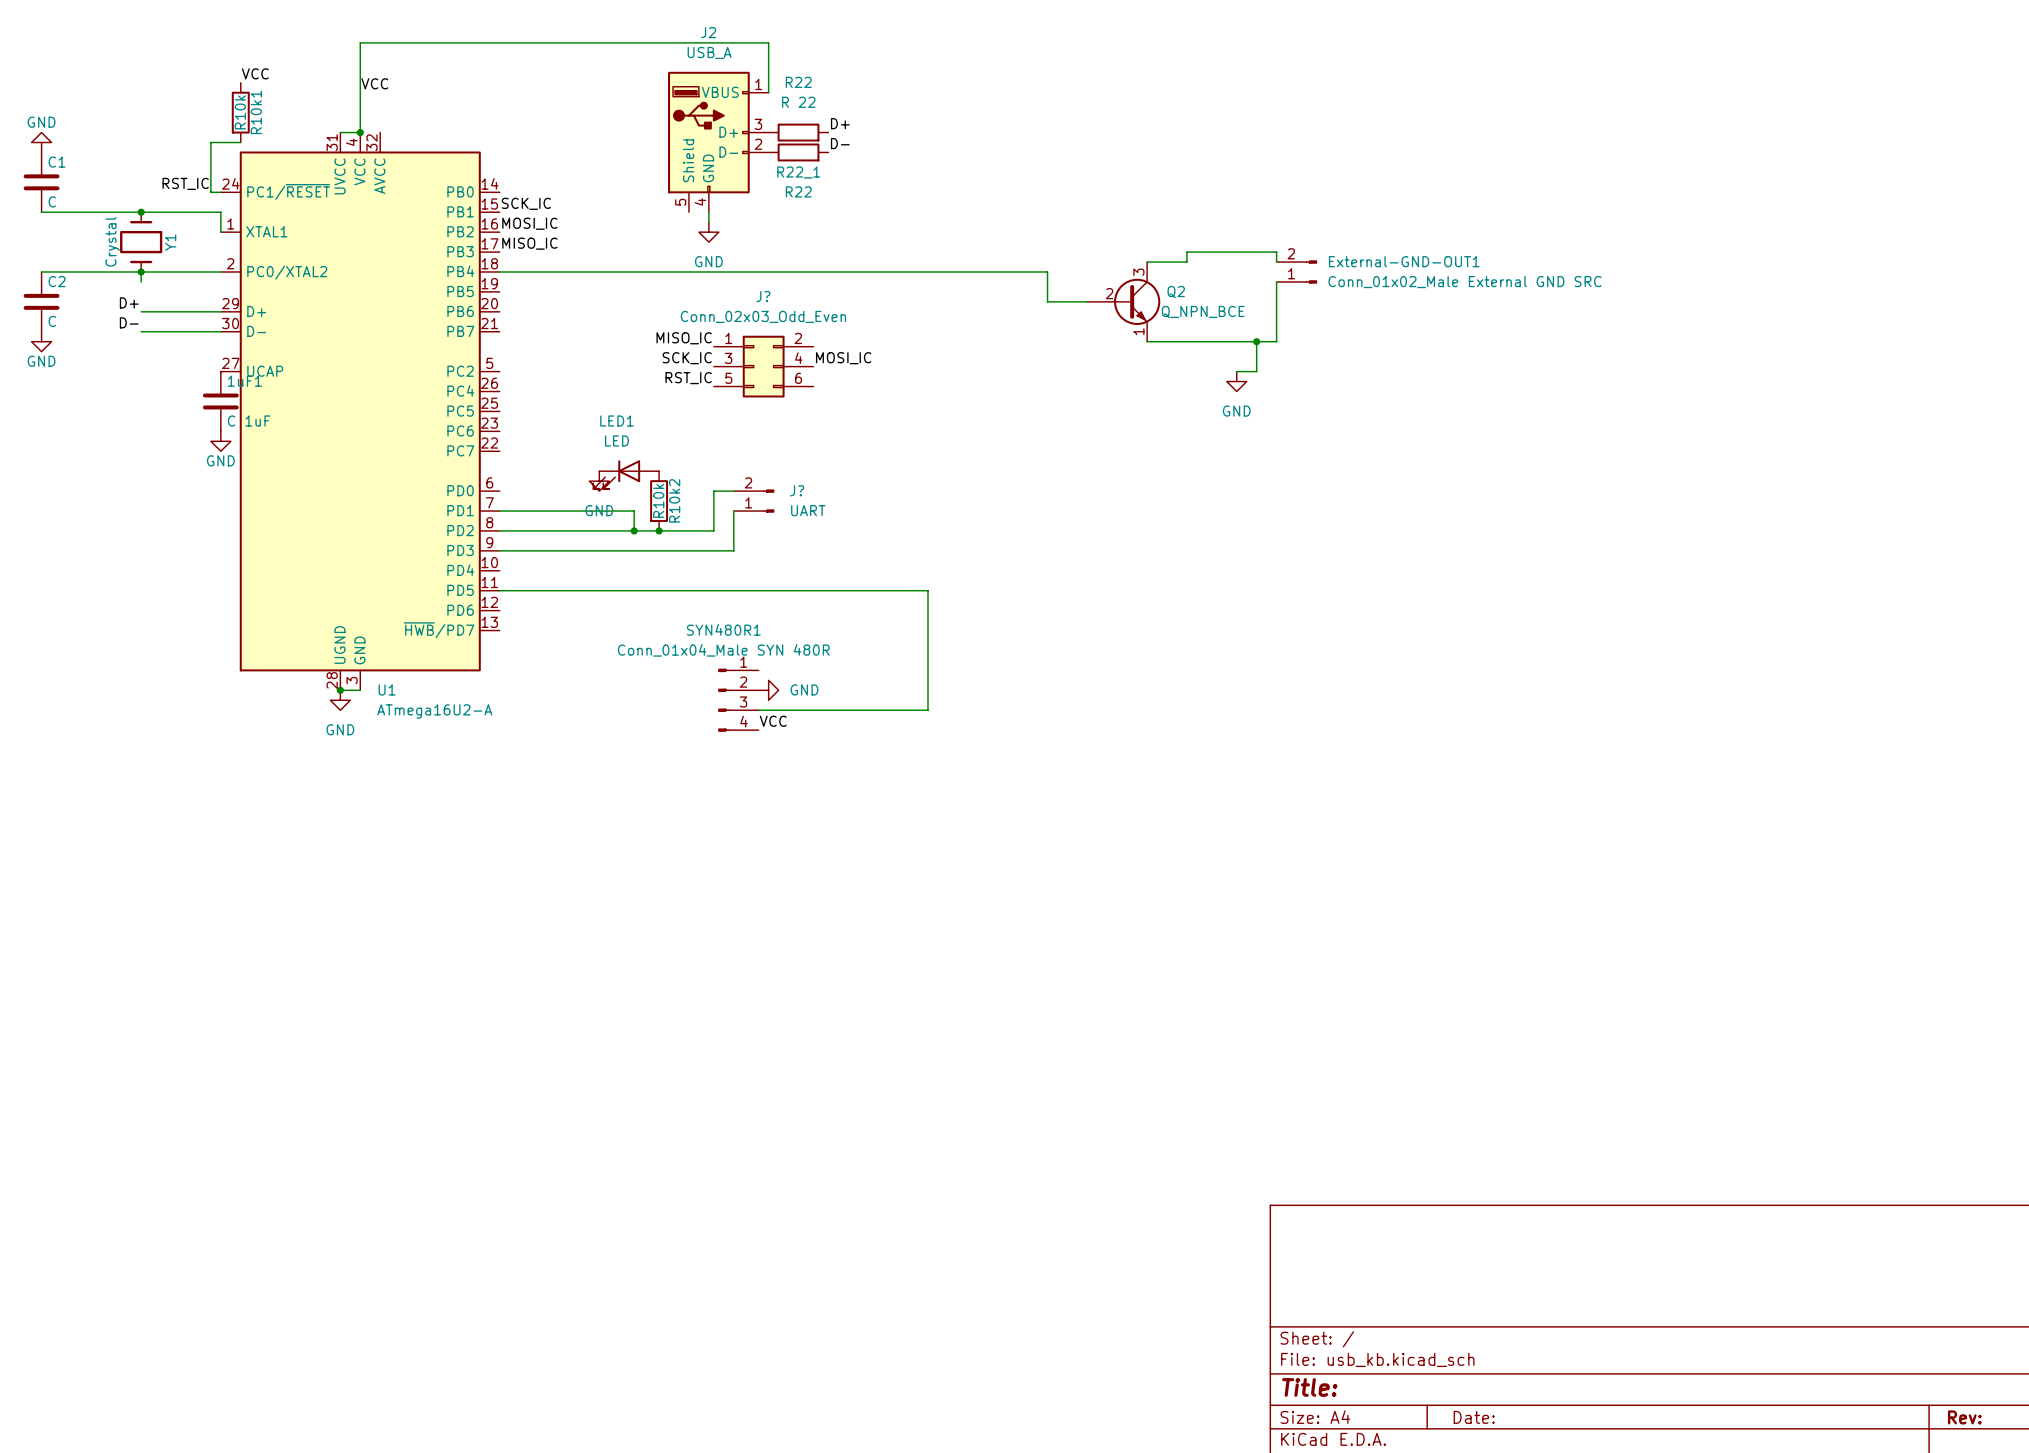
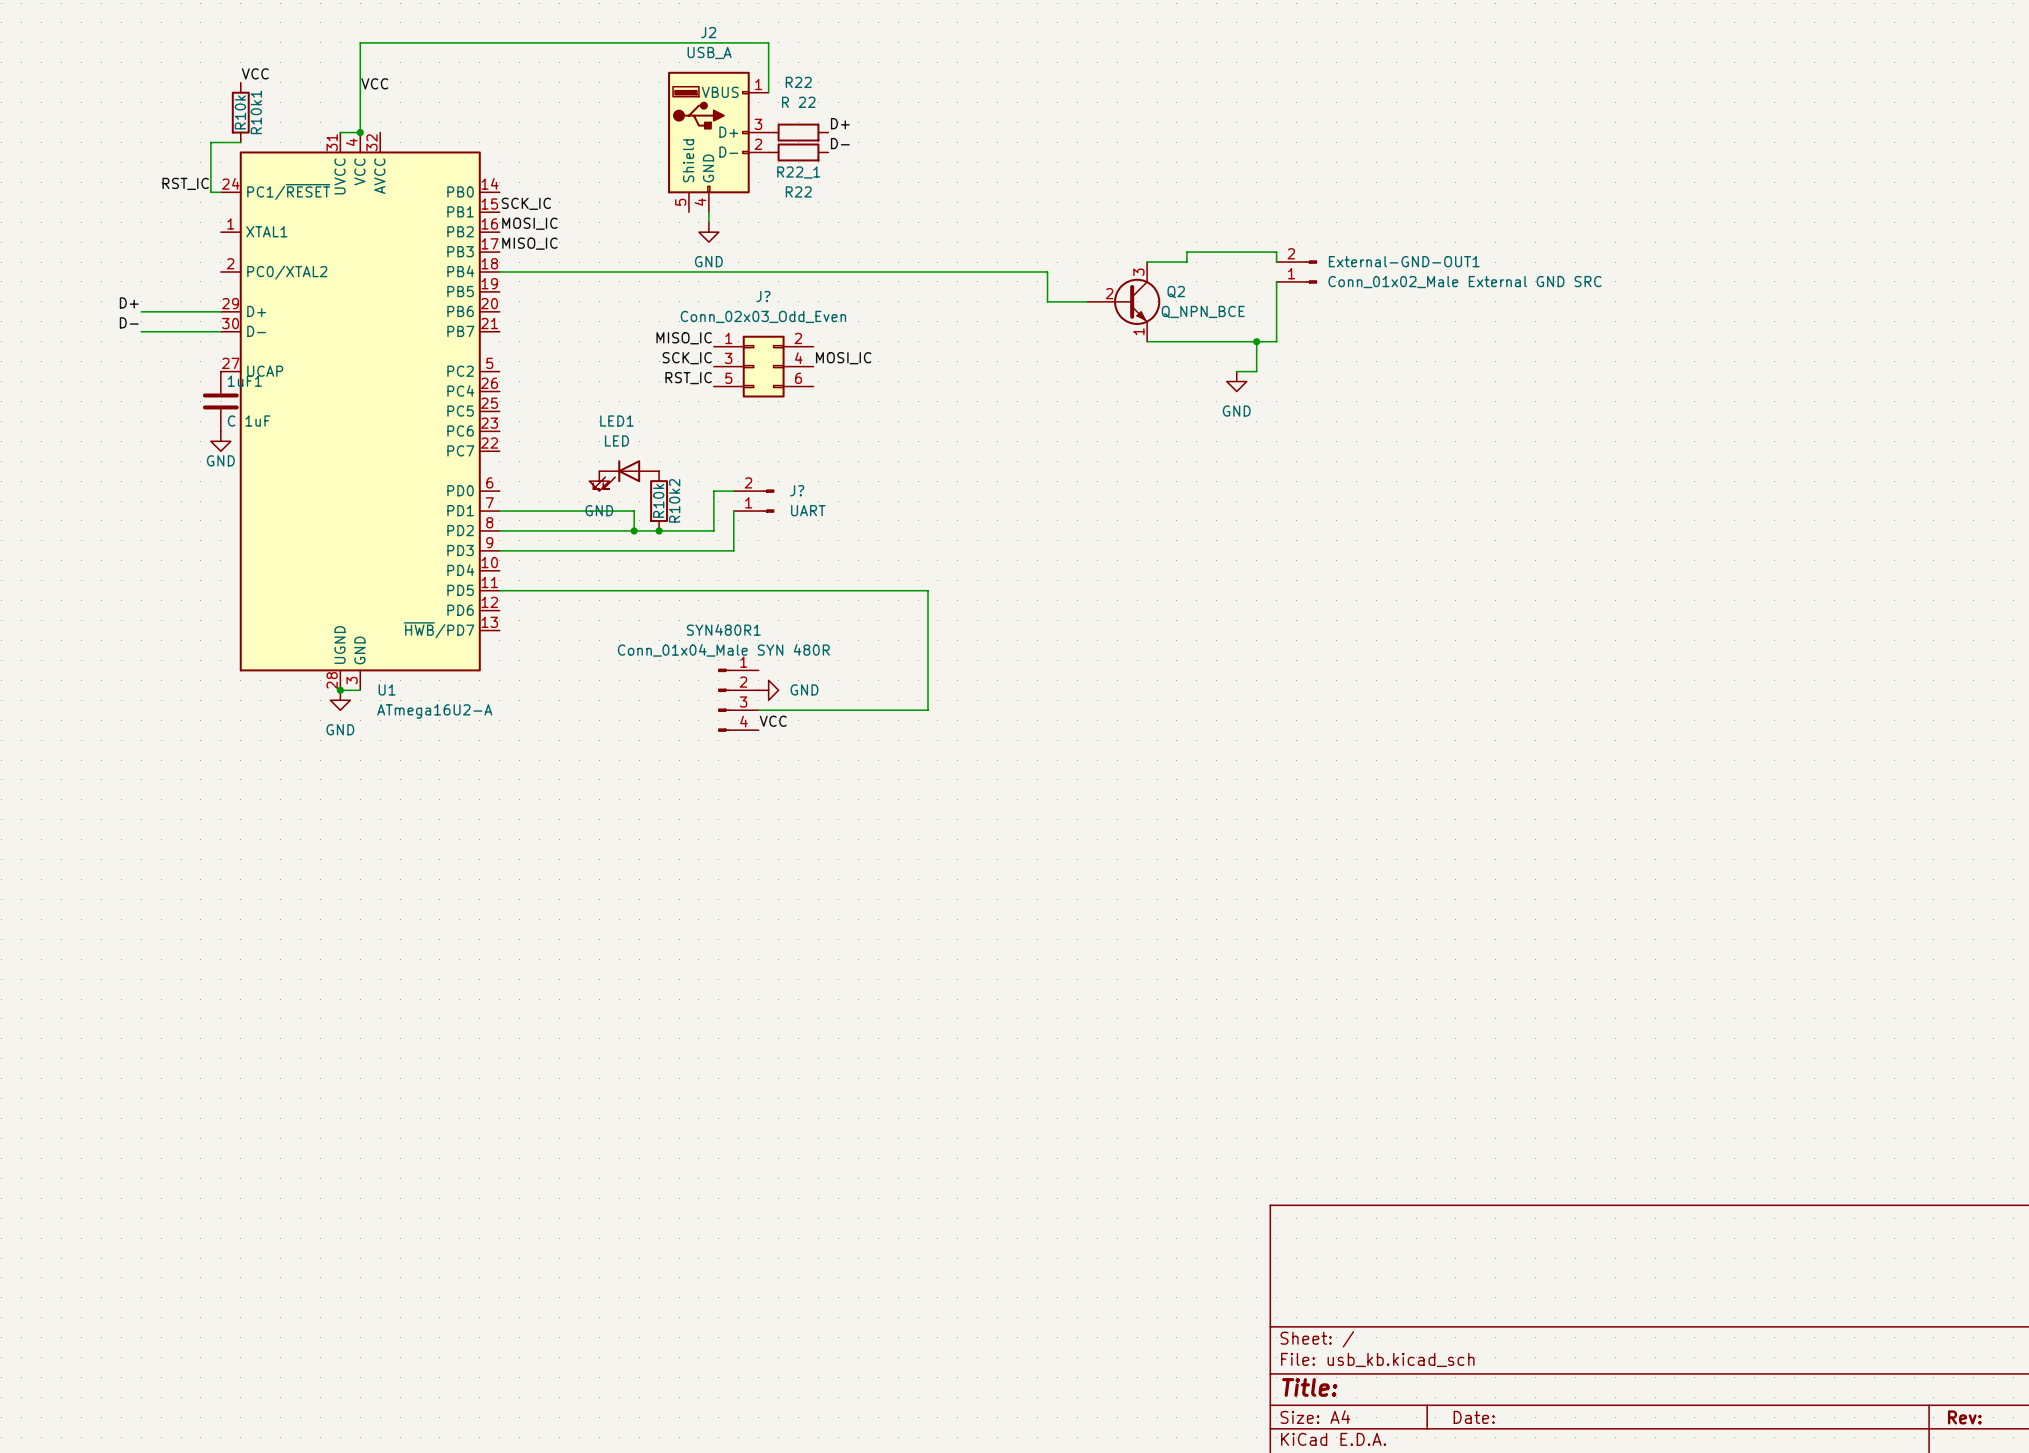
power symbol: GND (41, 142) -> none
C1: C (41, 182) -> none
wire: (41, 212) (220, 212) (220, 232) -> none
junction: (141, 212) -> none
Y1: Crystal (141, 242) -> none
wire: (41, 271) (220, 271) -> none
wire: (141, 271) (141, 281) -> none
junction: (141, 271) -> none
C2: C (41, 301) -> none
power symbol: GND (41, 341) -> none

